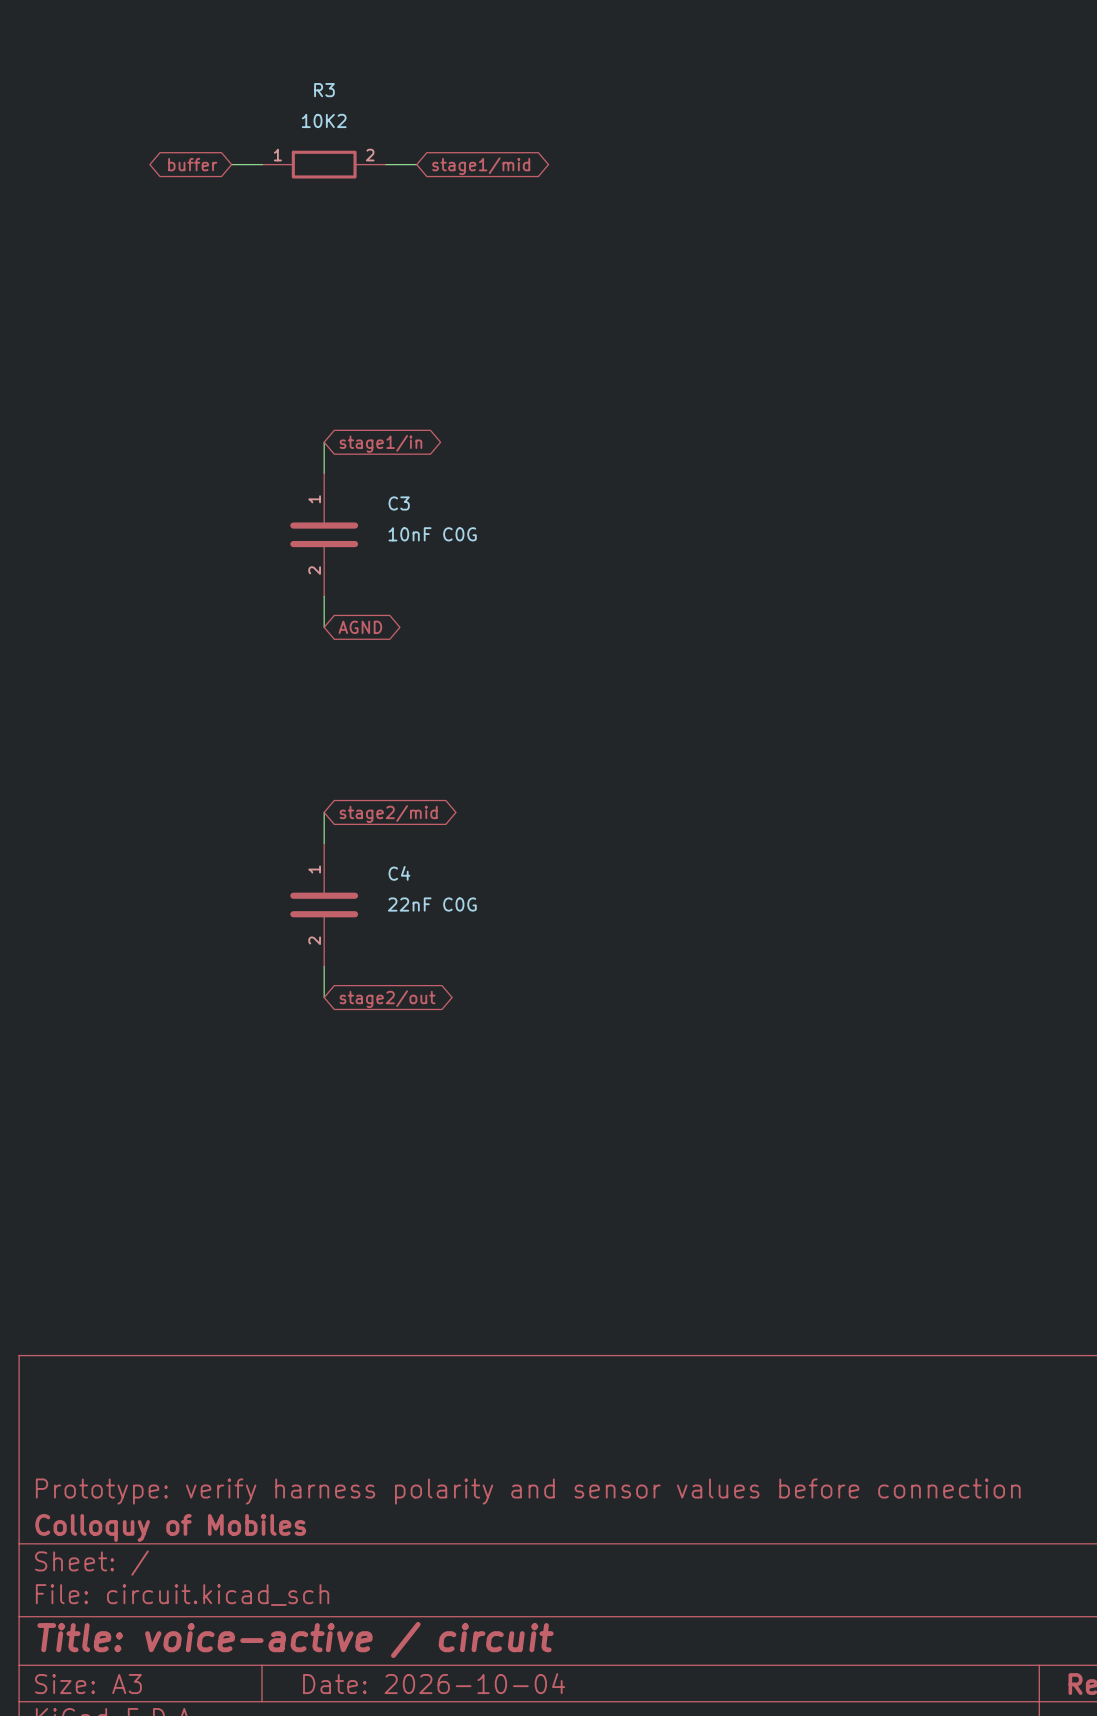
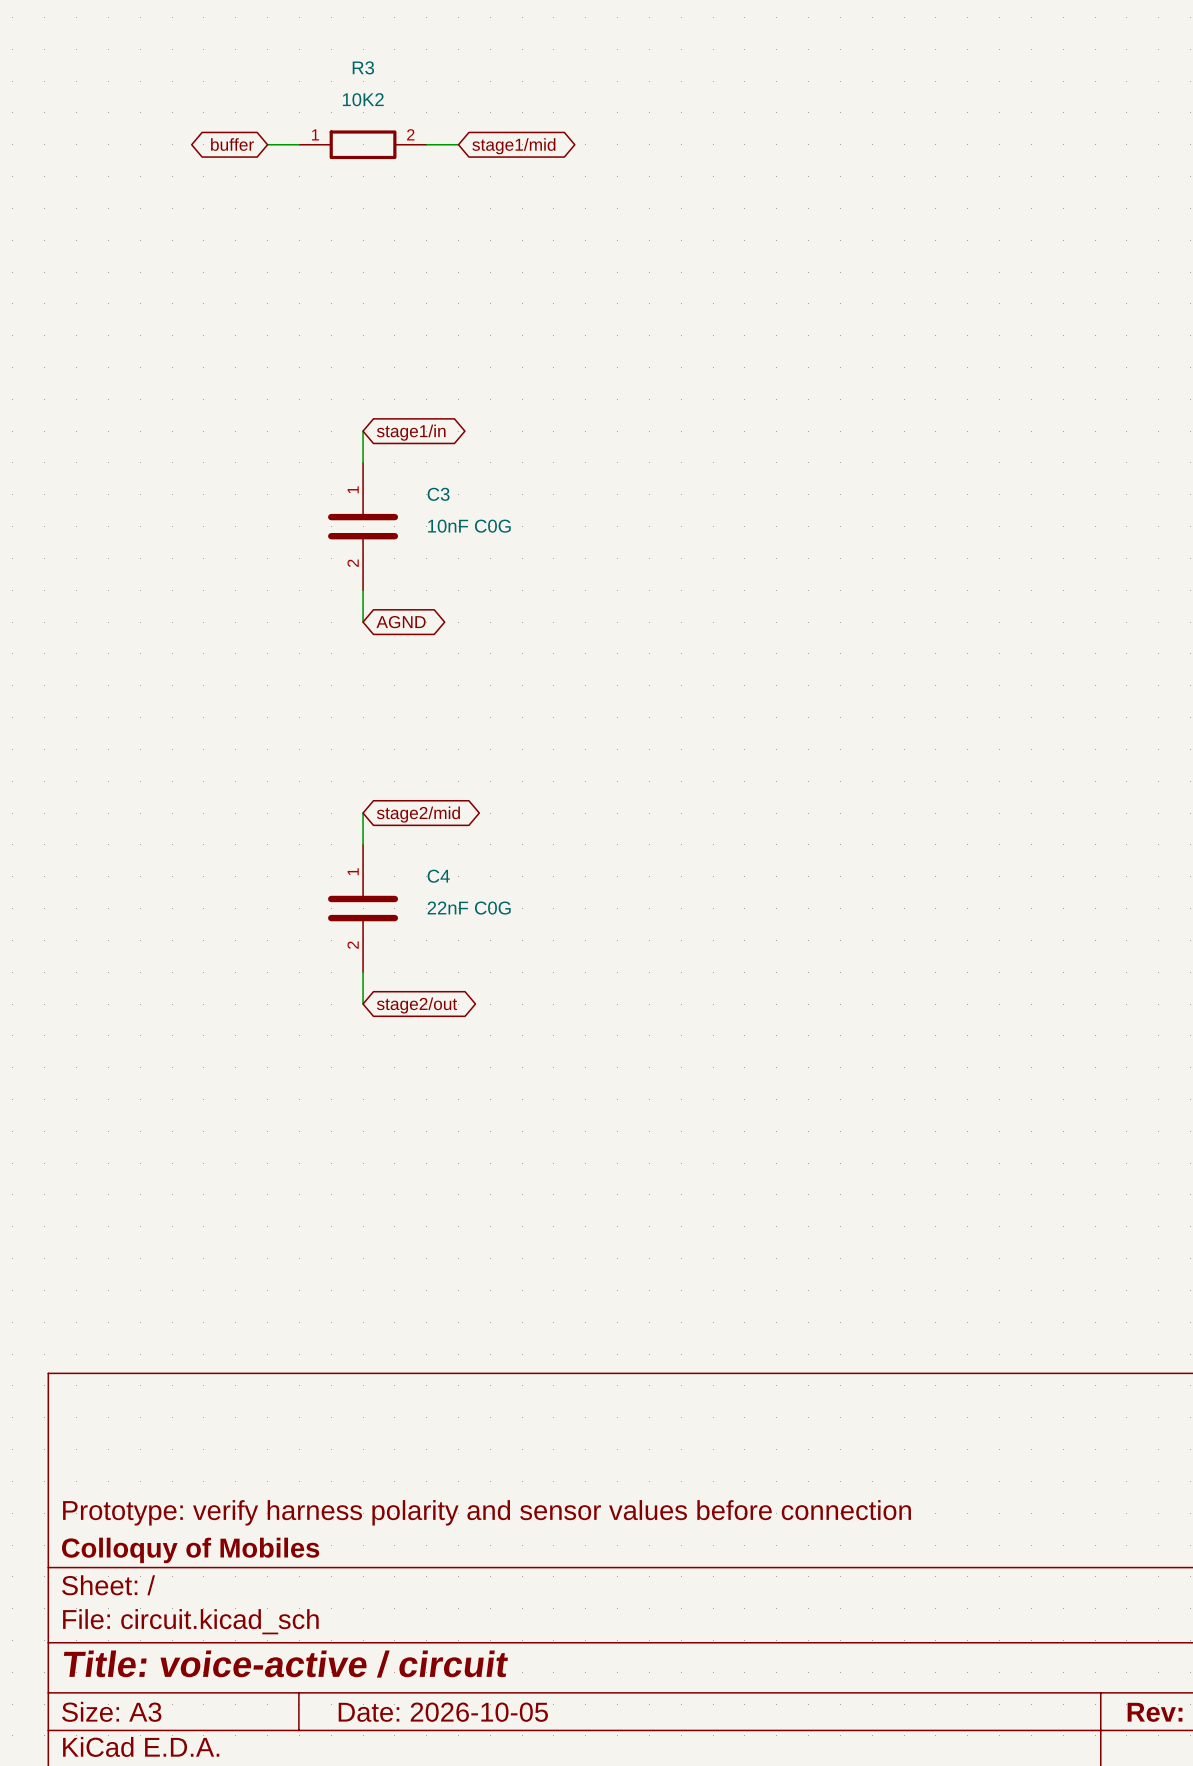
title block: Date: 2026-10-04 (434, 1683) -> Date: 2026-10-05 (443, 1712)

